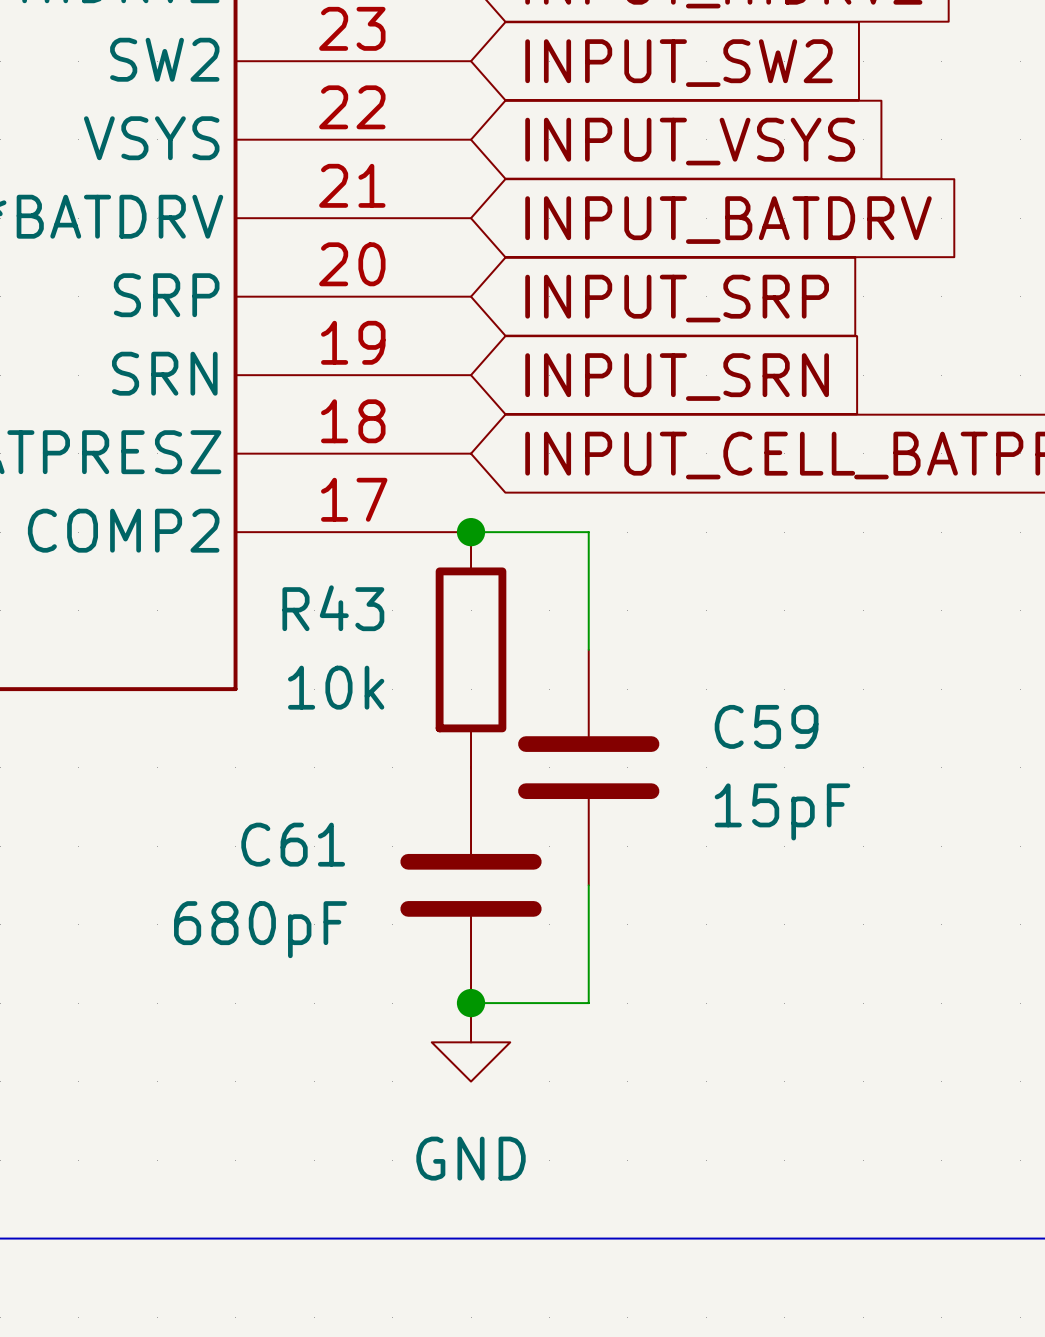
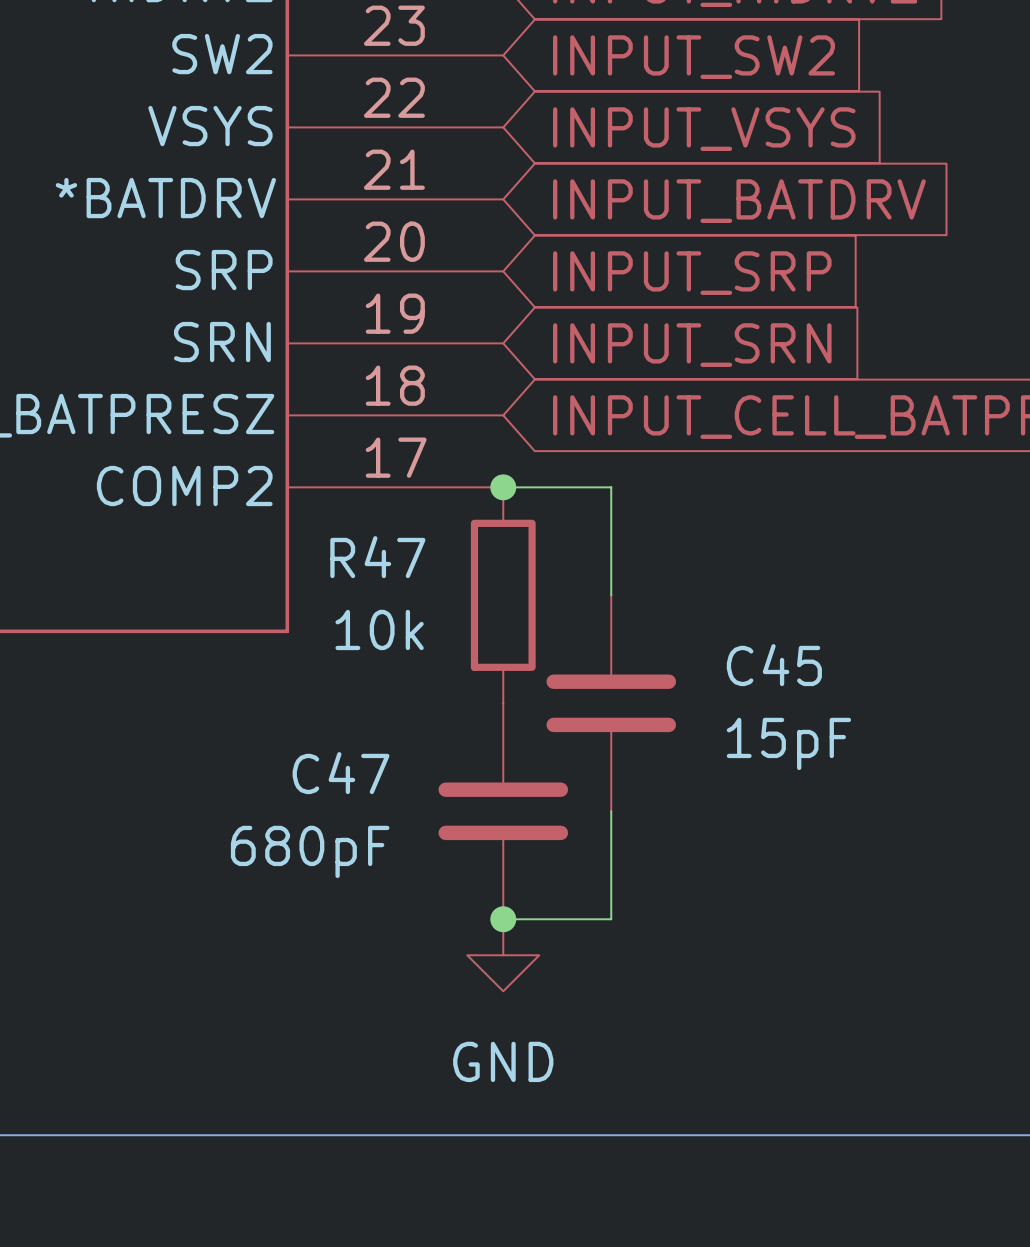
R43 name: R43 (333, 608) -> R47 (377, 557)
C59 name: C59 (766, 726) -> C45 (774, 665)
C61 name: C61 (293, 844) -> C47 (341, 773)

